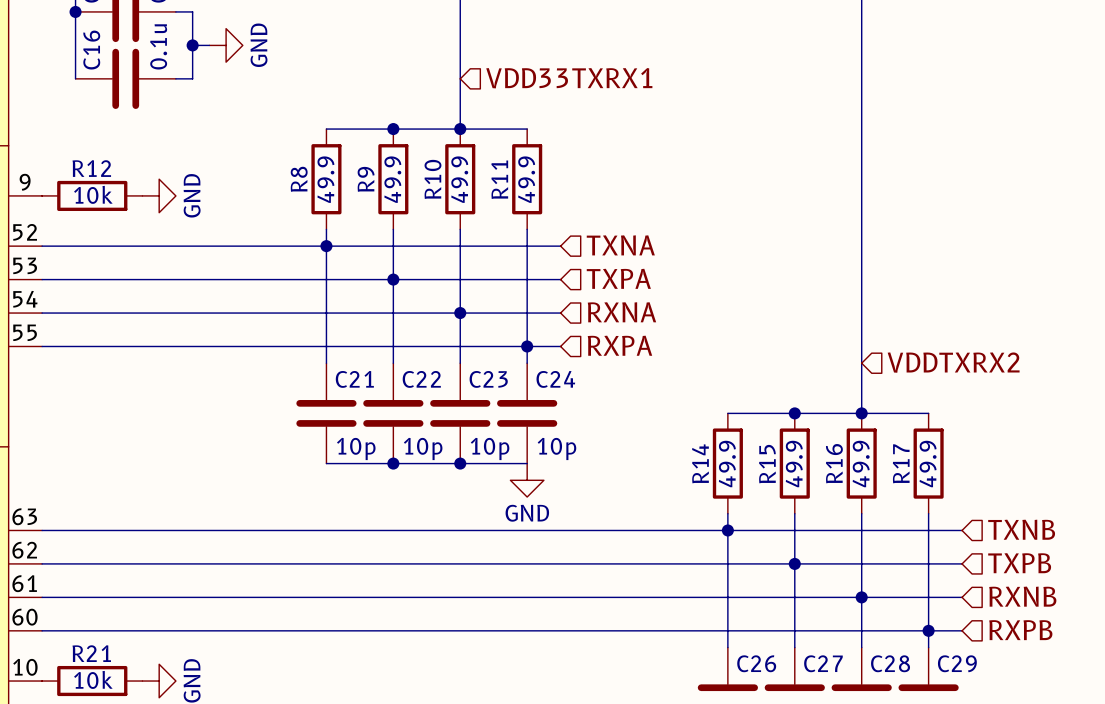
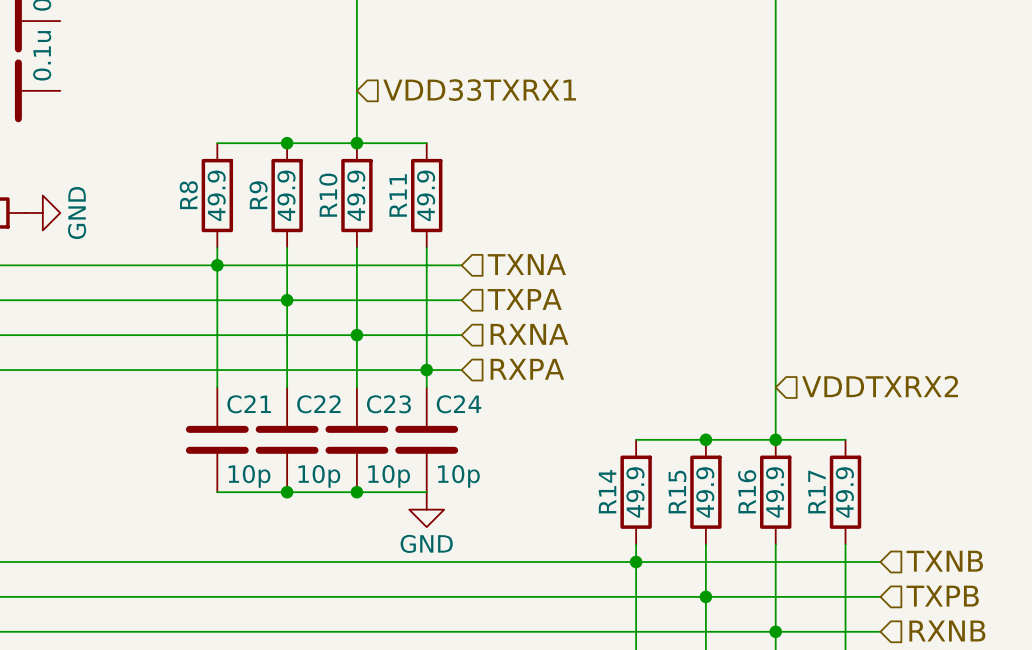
wire: (175, 11) (192, 11) (192, 78) (175, 78) -> none
wire: (192, 45) (209, 45) -> none
junction: (192, 45) -> none
power symbol: GND (226, 45) -> none

